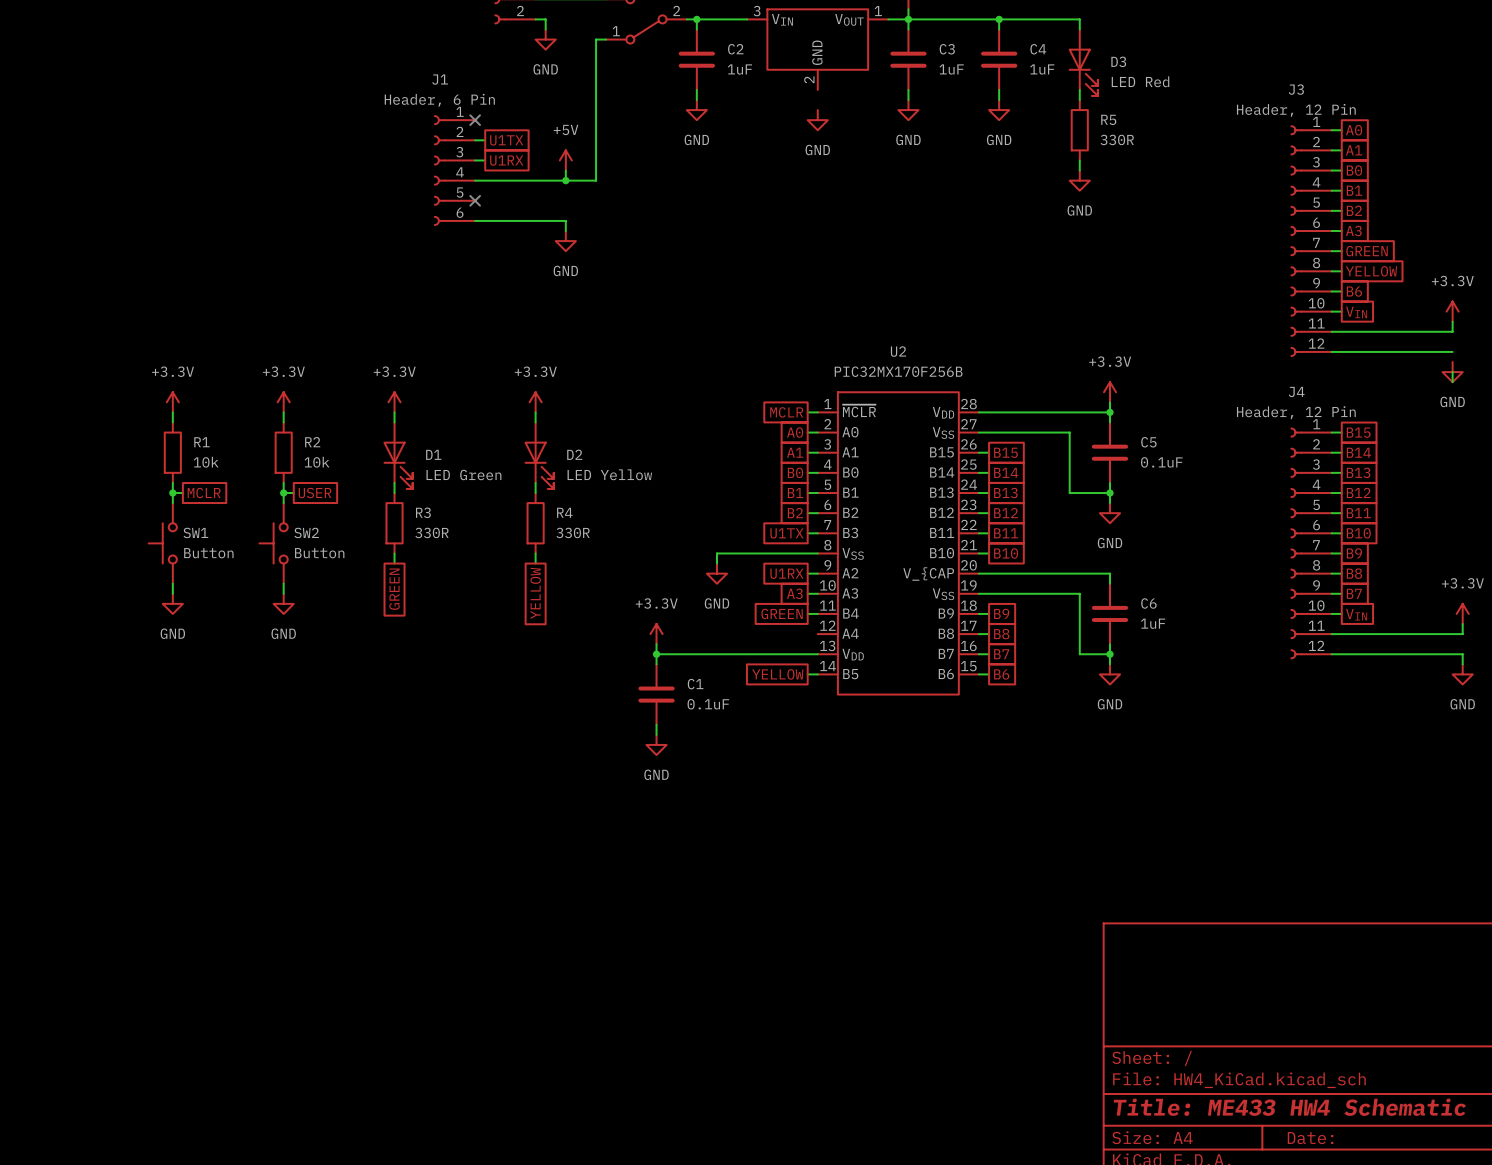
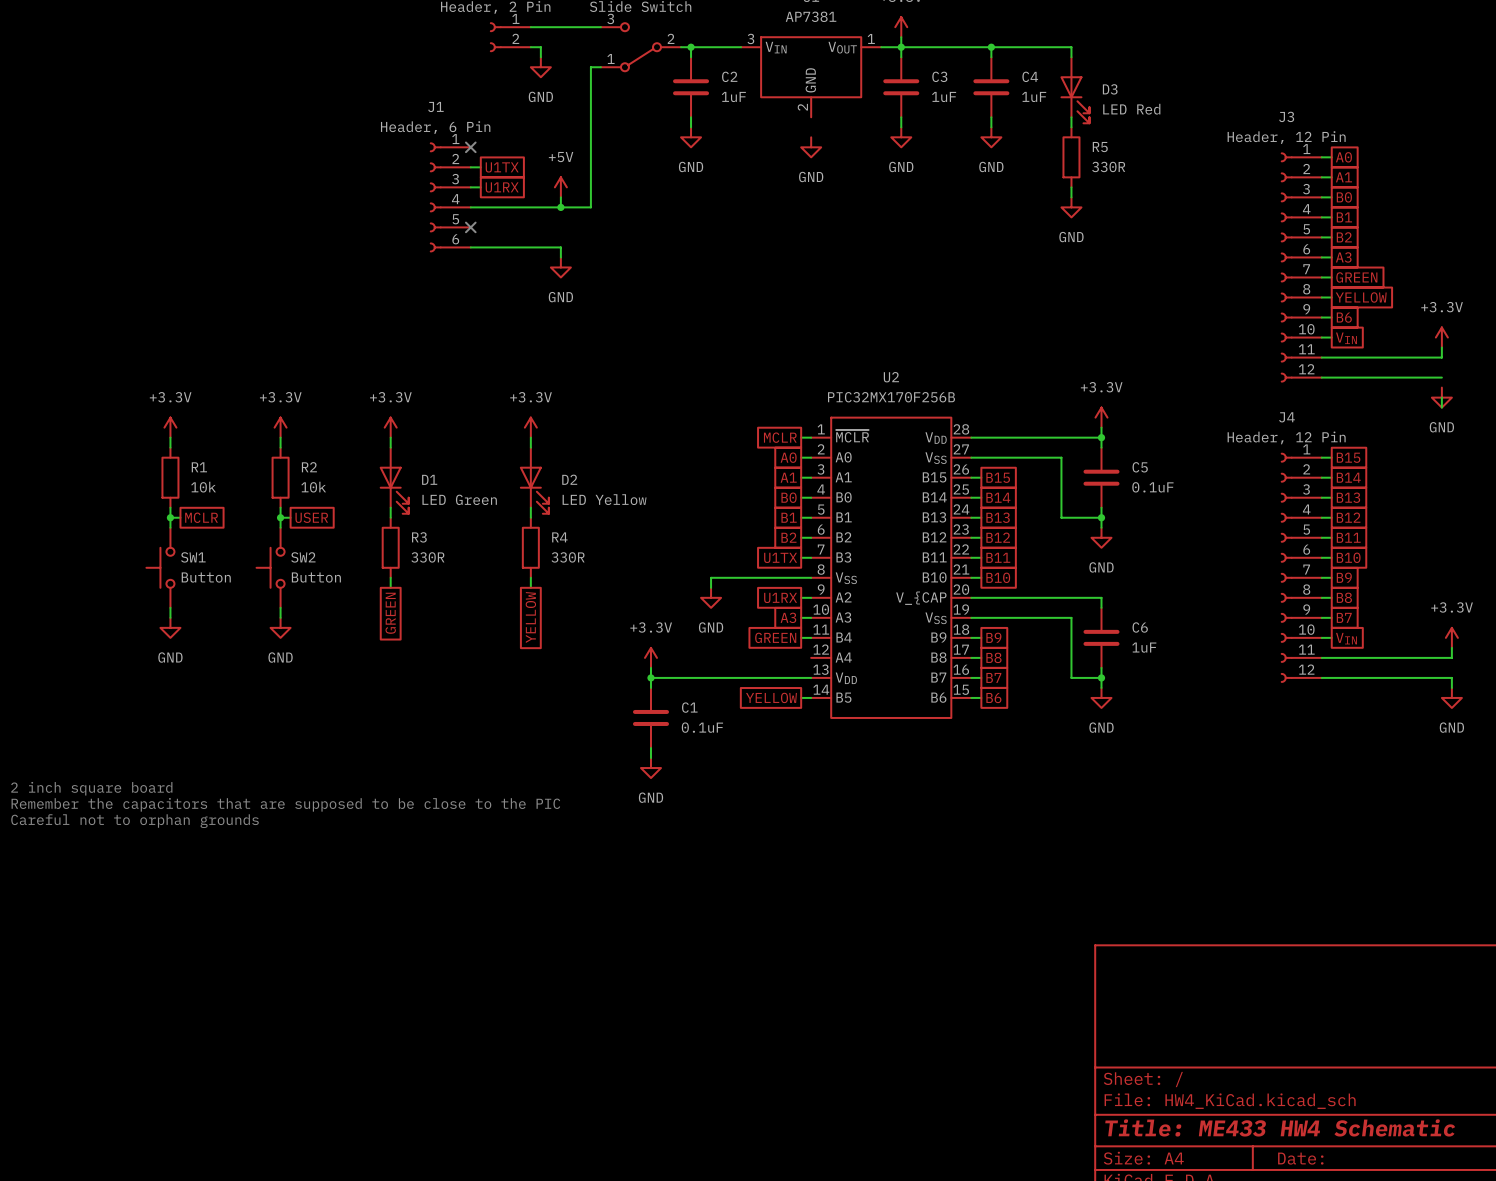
text: none -> 2 inch square board (91, 788)
text: none -> Remember the capacitors that are supposed to be close to the PIC (285, 804)
text: none -> Careful not to orphan grounds (135, 821)

